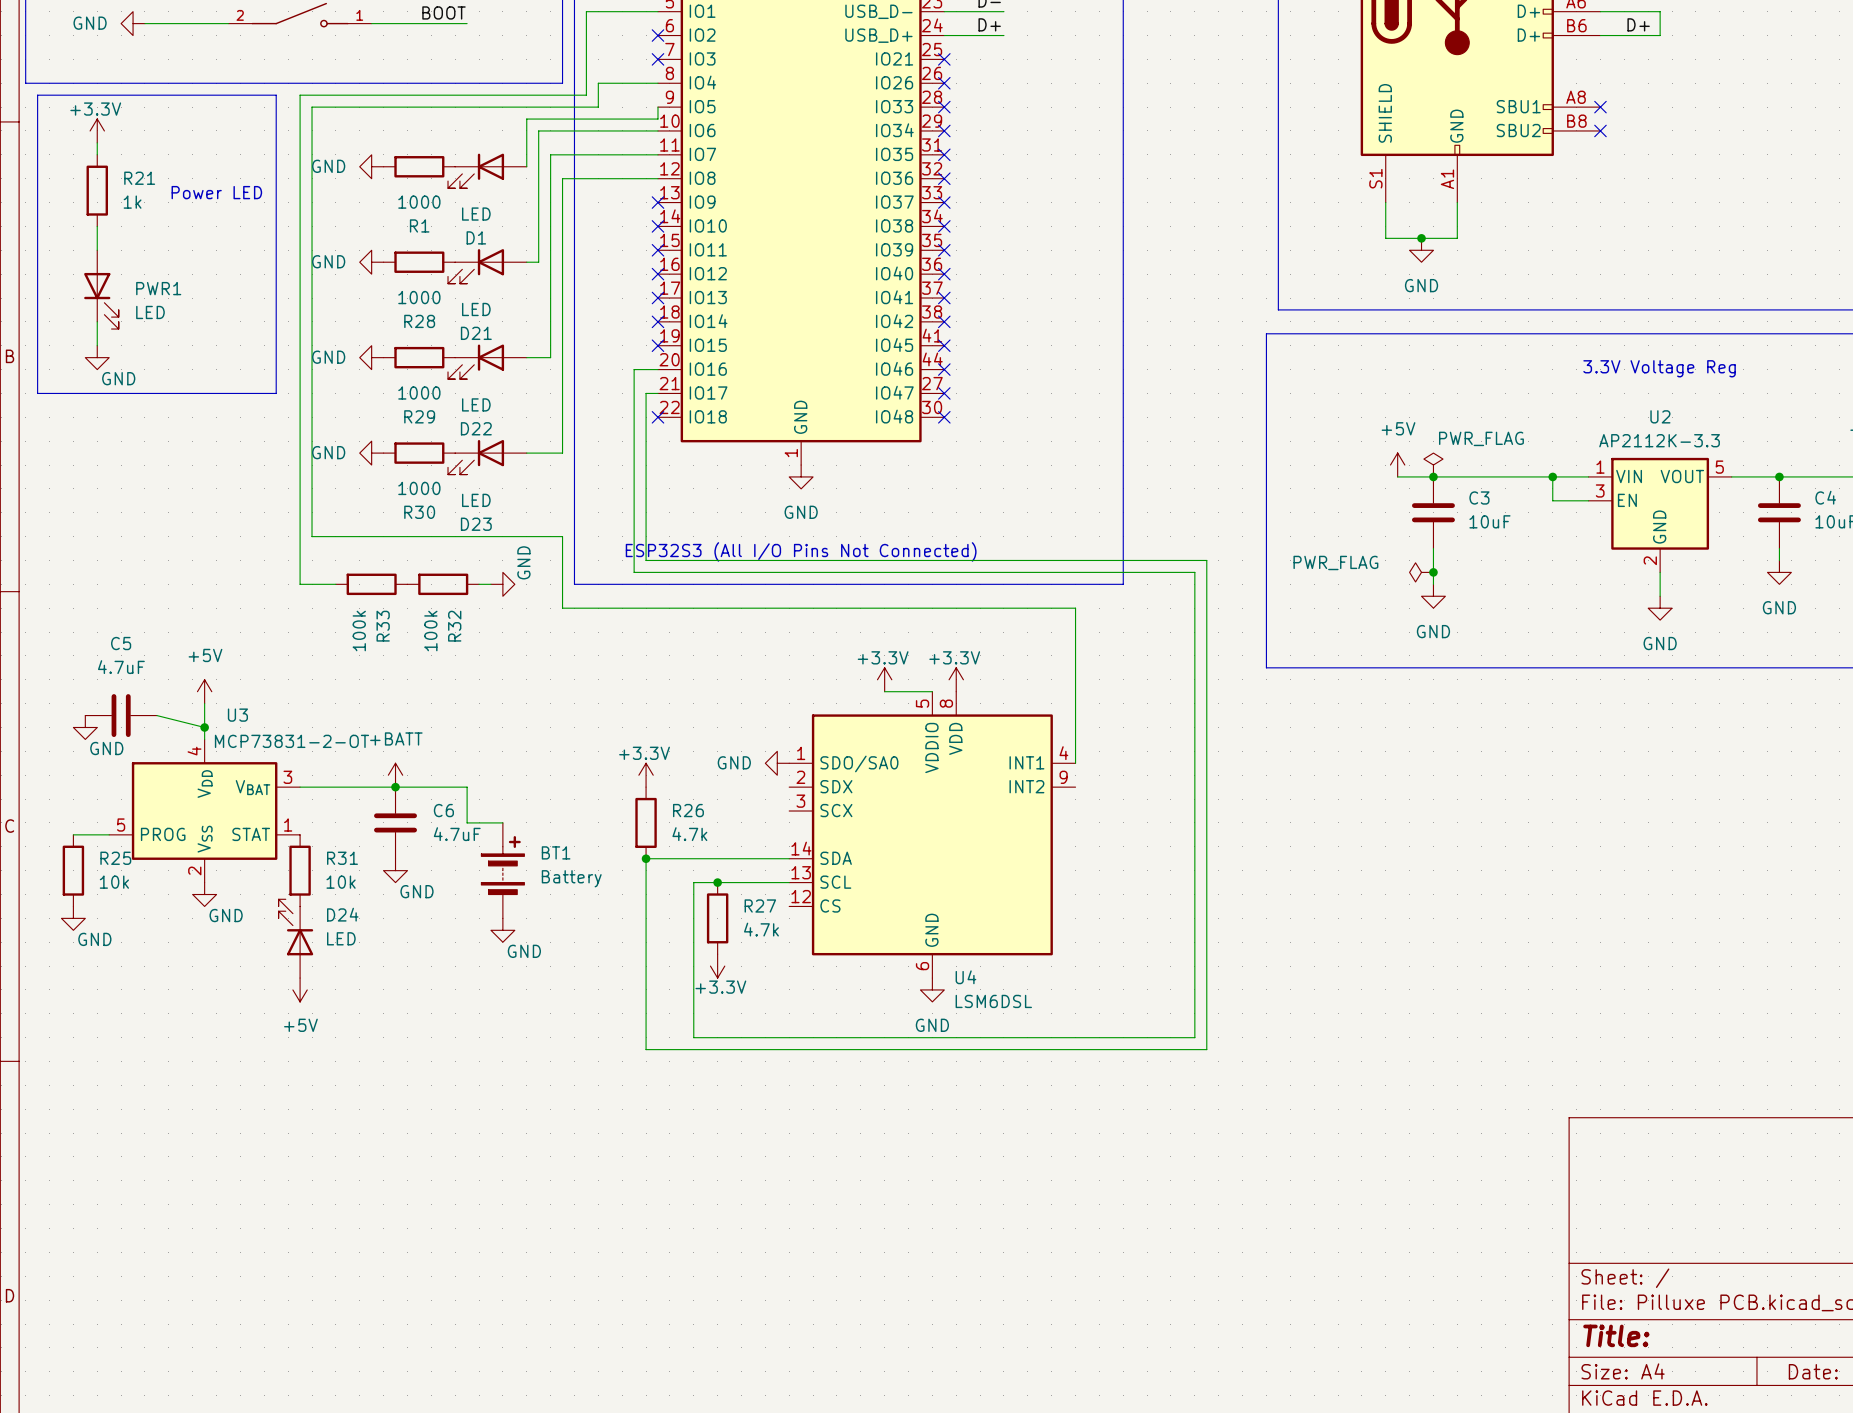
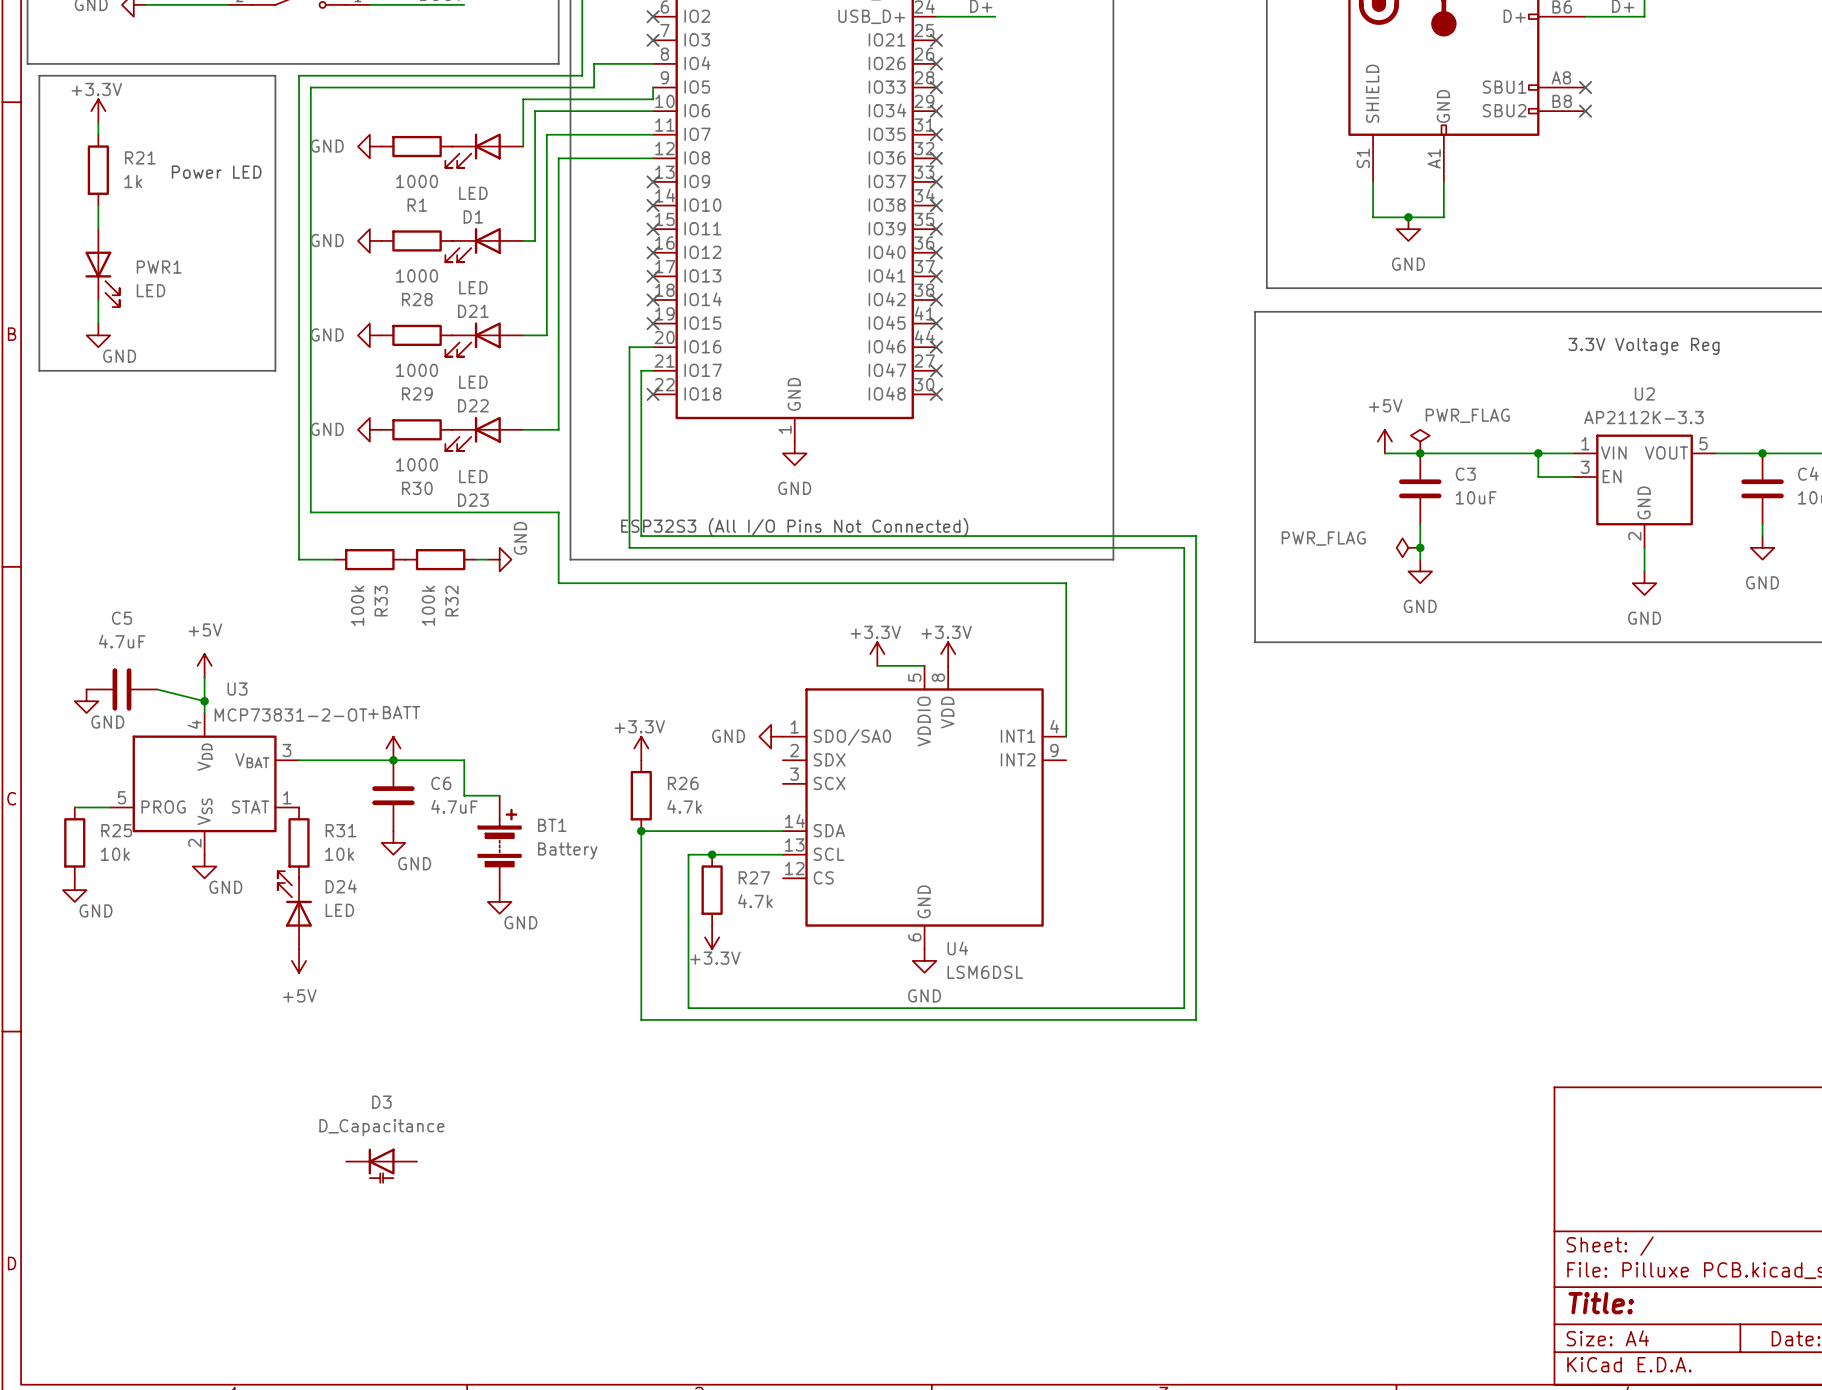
D3: none -> D_Capacitance (381, 1165)

